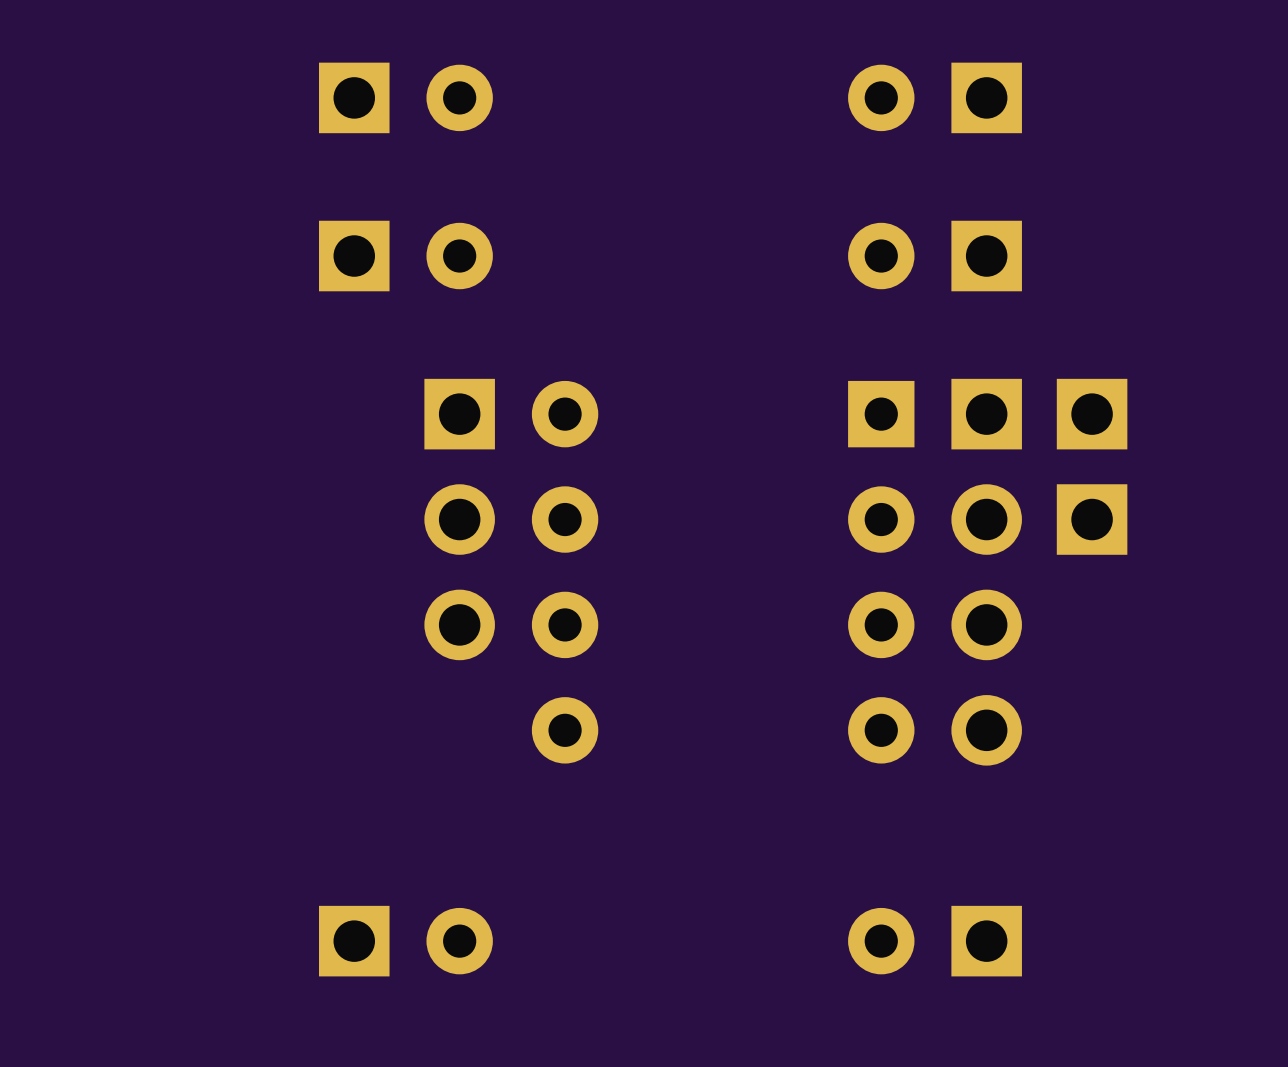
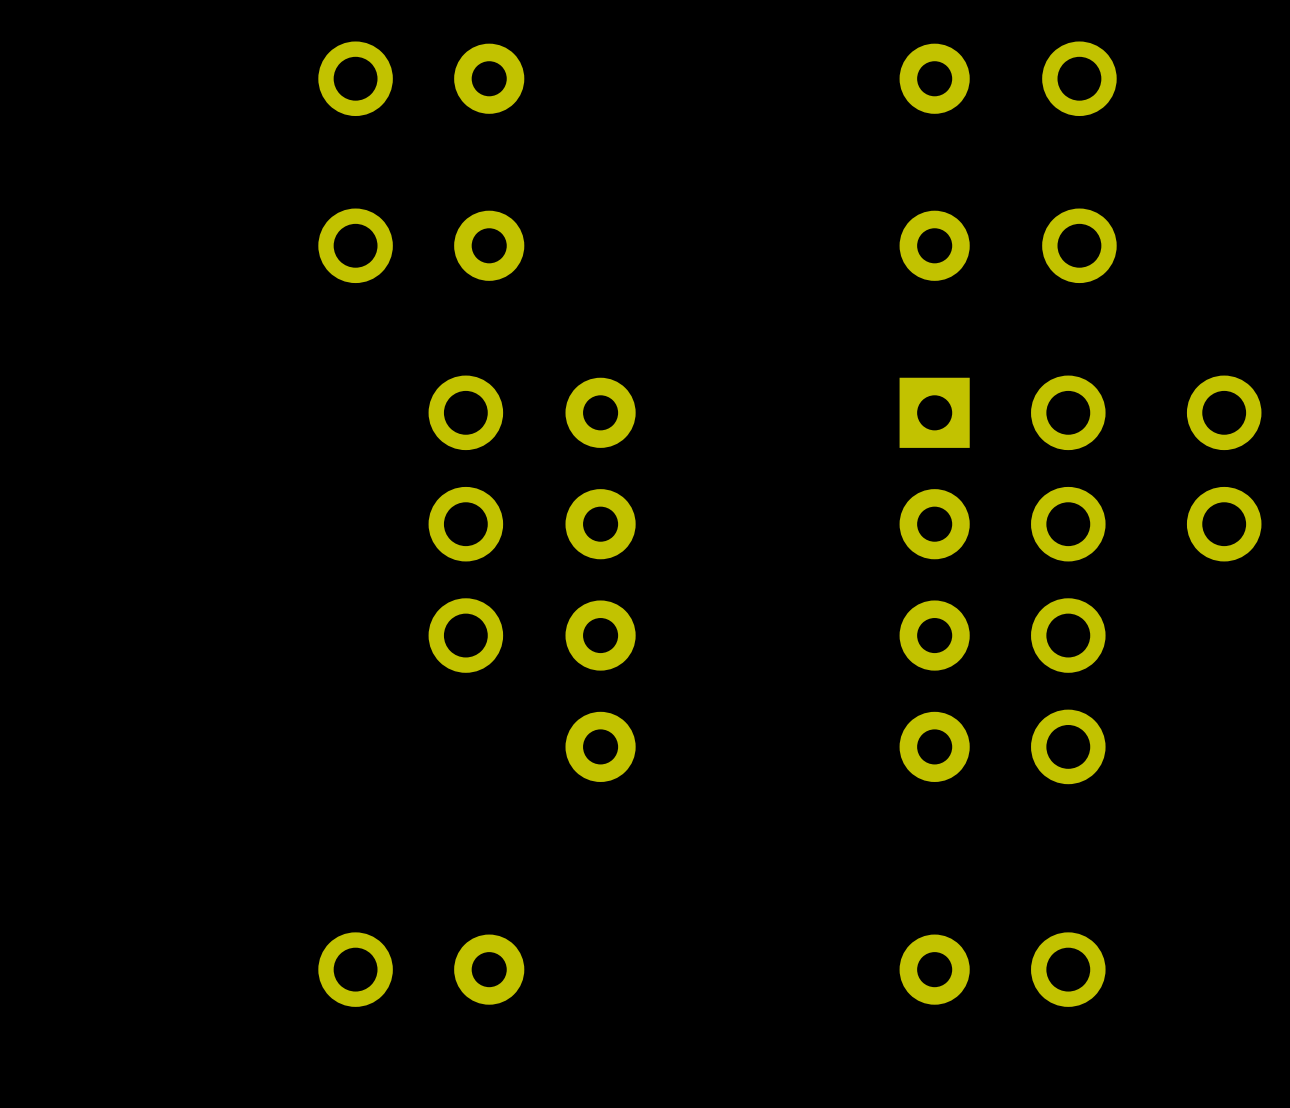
part footprint: [318, 62, 390, 134] -> [318, 41, 393, 117]
part footprint: [951, 62, 1022, 134] -> [1042, 41, 1117, 117]
part footprint: [318, 220, 390, 292] -> [318, 208, 393, 284]
part footprint: [951, 220, 1022, 292] -> [1042, 208, 1117, 284]
part footprint: [424, 378, 495, 661] -> [428, 375, 504, 673]
part footprint: [951, 378, 1022, 766] -> [1031, 375, 1106, 785]
part: (1092, 414) -> none
part: none -> (1224, 468)
part: (1092, 519) -> none
part footprint: [318, 905, 390, 977] -> [318, 932, 393, 1007]
part footprint: [951, 905, 1022, 977] -> [1031, 932, 1106, 1007]

